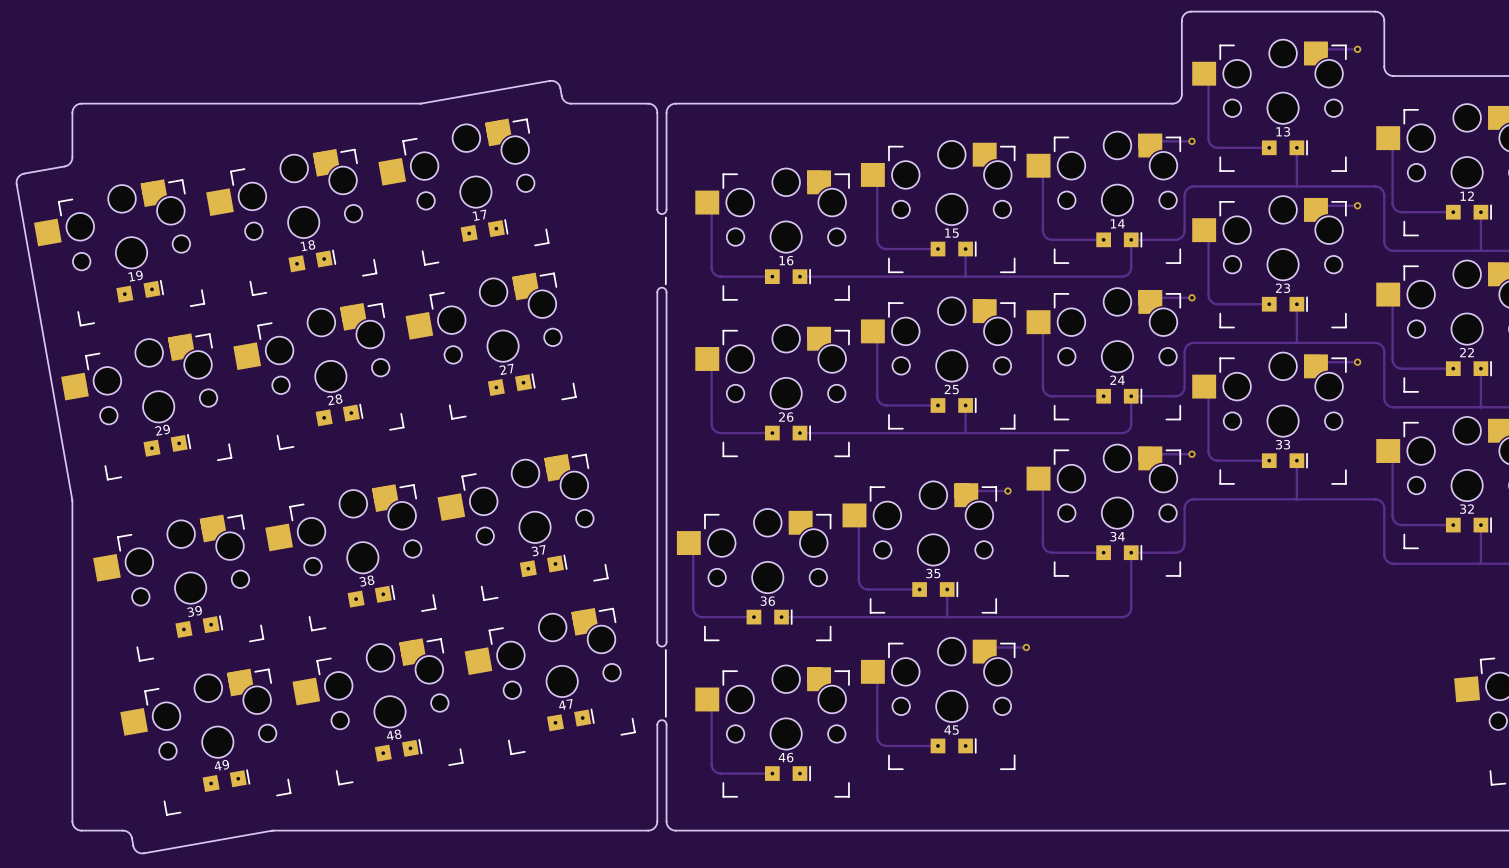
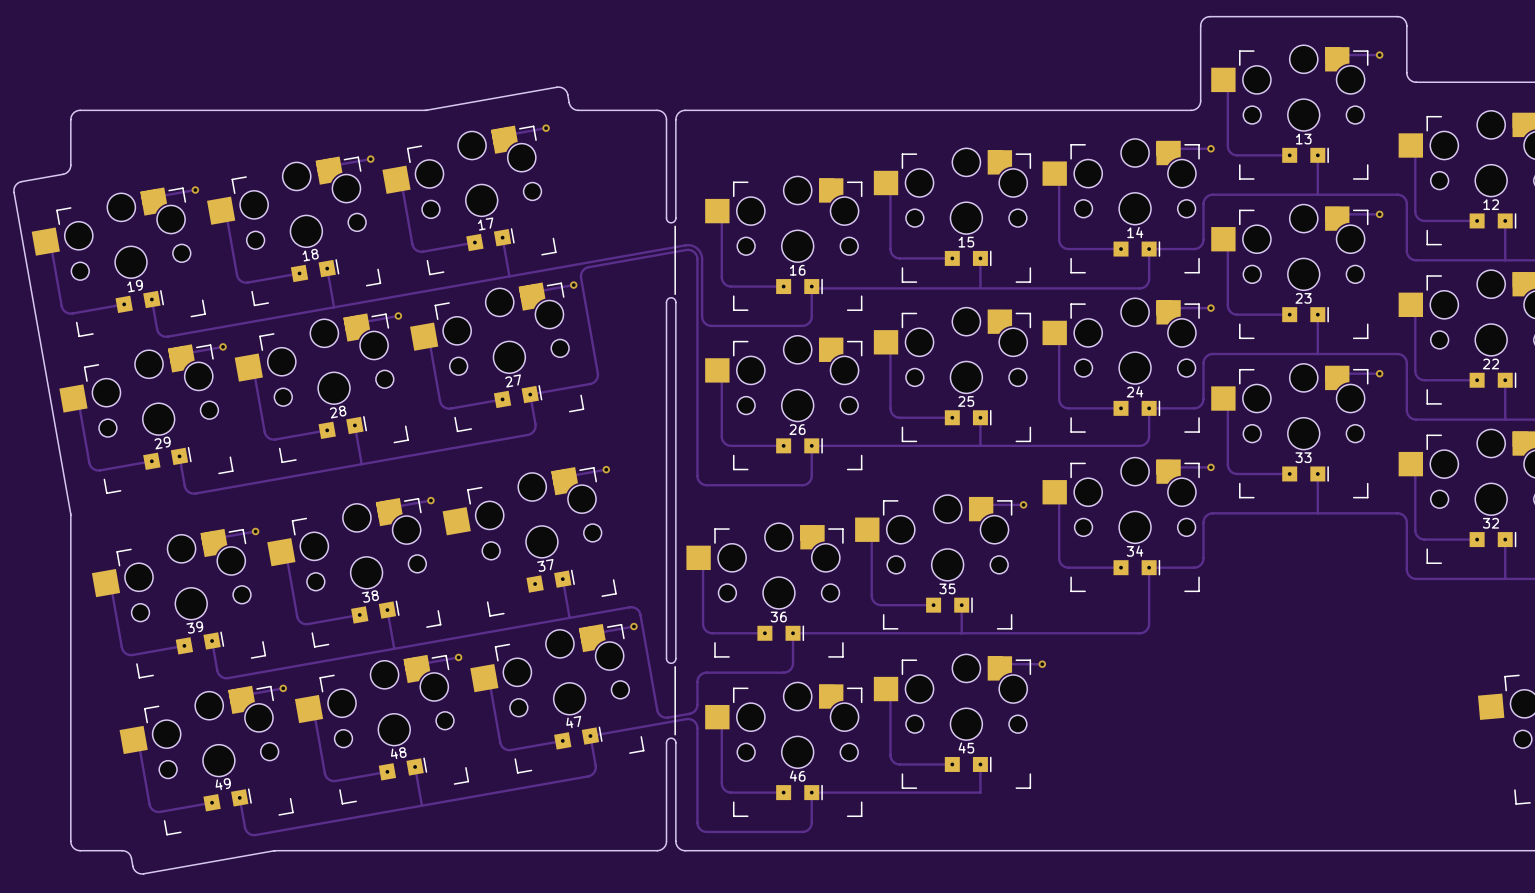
track: none -> (546, 128) (499, 136)
via: none -> (546, 128)
track: none -> (370, 159) (324, 167)
via: none -> (370, 159)
track: none -> (401, 183) (412, 244) (415, 249) (422, 251) (474, 242)
track: none -> (195, 190) (149, 198)
via: none -> (195, 190)
track: none -> (226, 214) (237, 274) (240, 280) (246, 282) (299, 273)
track: none -> (502, 237) (509, 276)
track: none -> (50, 244) (61, 305) (64, 311) (71, 313) (124, 304)
track: none -> (327, 268) (334, 307)
track: (1131, 267) (1128, 273) (1122, 276) (799, 276) -> (1149, 277) (1147, 284) (1139, 288) (813, 288) (811, 286) (811, 317) (805, 325) (710, 325) (704, 323) (702, 317) (701, 255) (697, 248) (687, 245) (166, 336) (160, 335) (157, 331) (151, 299)
track: none -> (573, 285) (527, 293)
via: none -> (573, 285)
track: none -> (398, 315) (352, 324)
via: none -> (398, 315)
track: none -> (429, 340) (440, 400) (443, 406) (449, 408) (502, 399)
track: none -> (223, 346) (176, 355)
via: none -> (223, 346)
track: none -> (253, 370) (264, 431) (267, 437) (274, 439) (327, 430)
track: none -> (78, 401) (89, 462) (92, 468) (99, 470) (151, 461)
track: none -> (354, 425) (361, 464)
track: none -> (811, 445) (811, 476) (805, 484) (706, 485) (698, 480) (697, 259) (694, 252) (687, 249) (588, 267) (583, 270) (581, 278) (597, 377) (591, 383) (530, 394) (535, 425) (534, 430) (530, 434) (194, 493) (188, 491) (185, 487) (179, 456)
track: none -> (606, 469) (560, 477)
via: none -> (606, 469)
track: none -> (430, 500) (384, 508)
via: none -> (430, 500)
track: none -> (255, 531) (209, 539)
via: none -> (255, 531)
track: none -> (286, 555) (297, 616) (300, 621) (308, 624) (359, 614)
track: none -> (562, 579) (569, 617)
track: none -> (111, 586) (121, 647) (124, 652) (131, 655) (184, 645)
track: none -> (387, 610) (394, 648)
track: none -> (633, 626) (587, 634)
via: none -> (633, 626)
track: none -> (793, 633) (792, 664) (788, 671) (703, 673) (697, 679) (697, 705) (695, 710) (690, 713) (667, 717) (661, 716) (657, 711) (640, 613) (632, 607) (227, 678) (222, 677) (217, 672) (212, 640)
track: none -> (458, 657) (412, 665)
via: none -> (458, 657)
track: none -> (489, 681) (500, 742) (503, 747) (510, 750) (562, 740)
track: none -> (283, 688) (237, 696)
via: none -> (283, 688)
track: none -> (314, 712) (324, 773) (327, 778) (334, 781) (387, 771)
track: none -> (138, 743) (149, 804) (152, 809) (159, 811) (212, 802)
track: none -> (980, 764) (980, 792) (811, 792) (811, 824) (808, 829) (802, 831) (706, 831) (700, 829) (697, 822) (697, 727) (694, 721) (688, 718) (590, 736) (595, 767) (593, 773) (589, 776) (255, 835) (249, 834) (245, 829) (239, 797)
track: none -> (415, 766) (421, 805)

